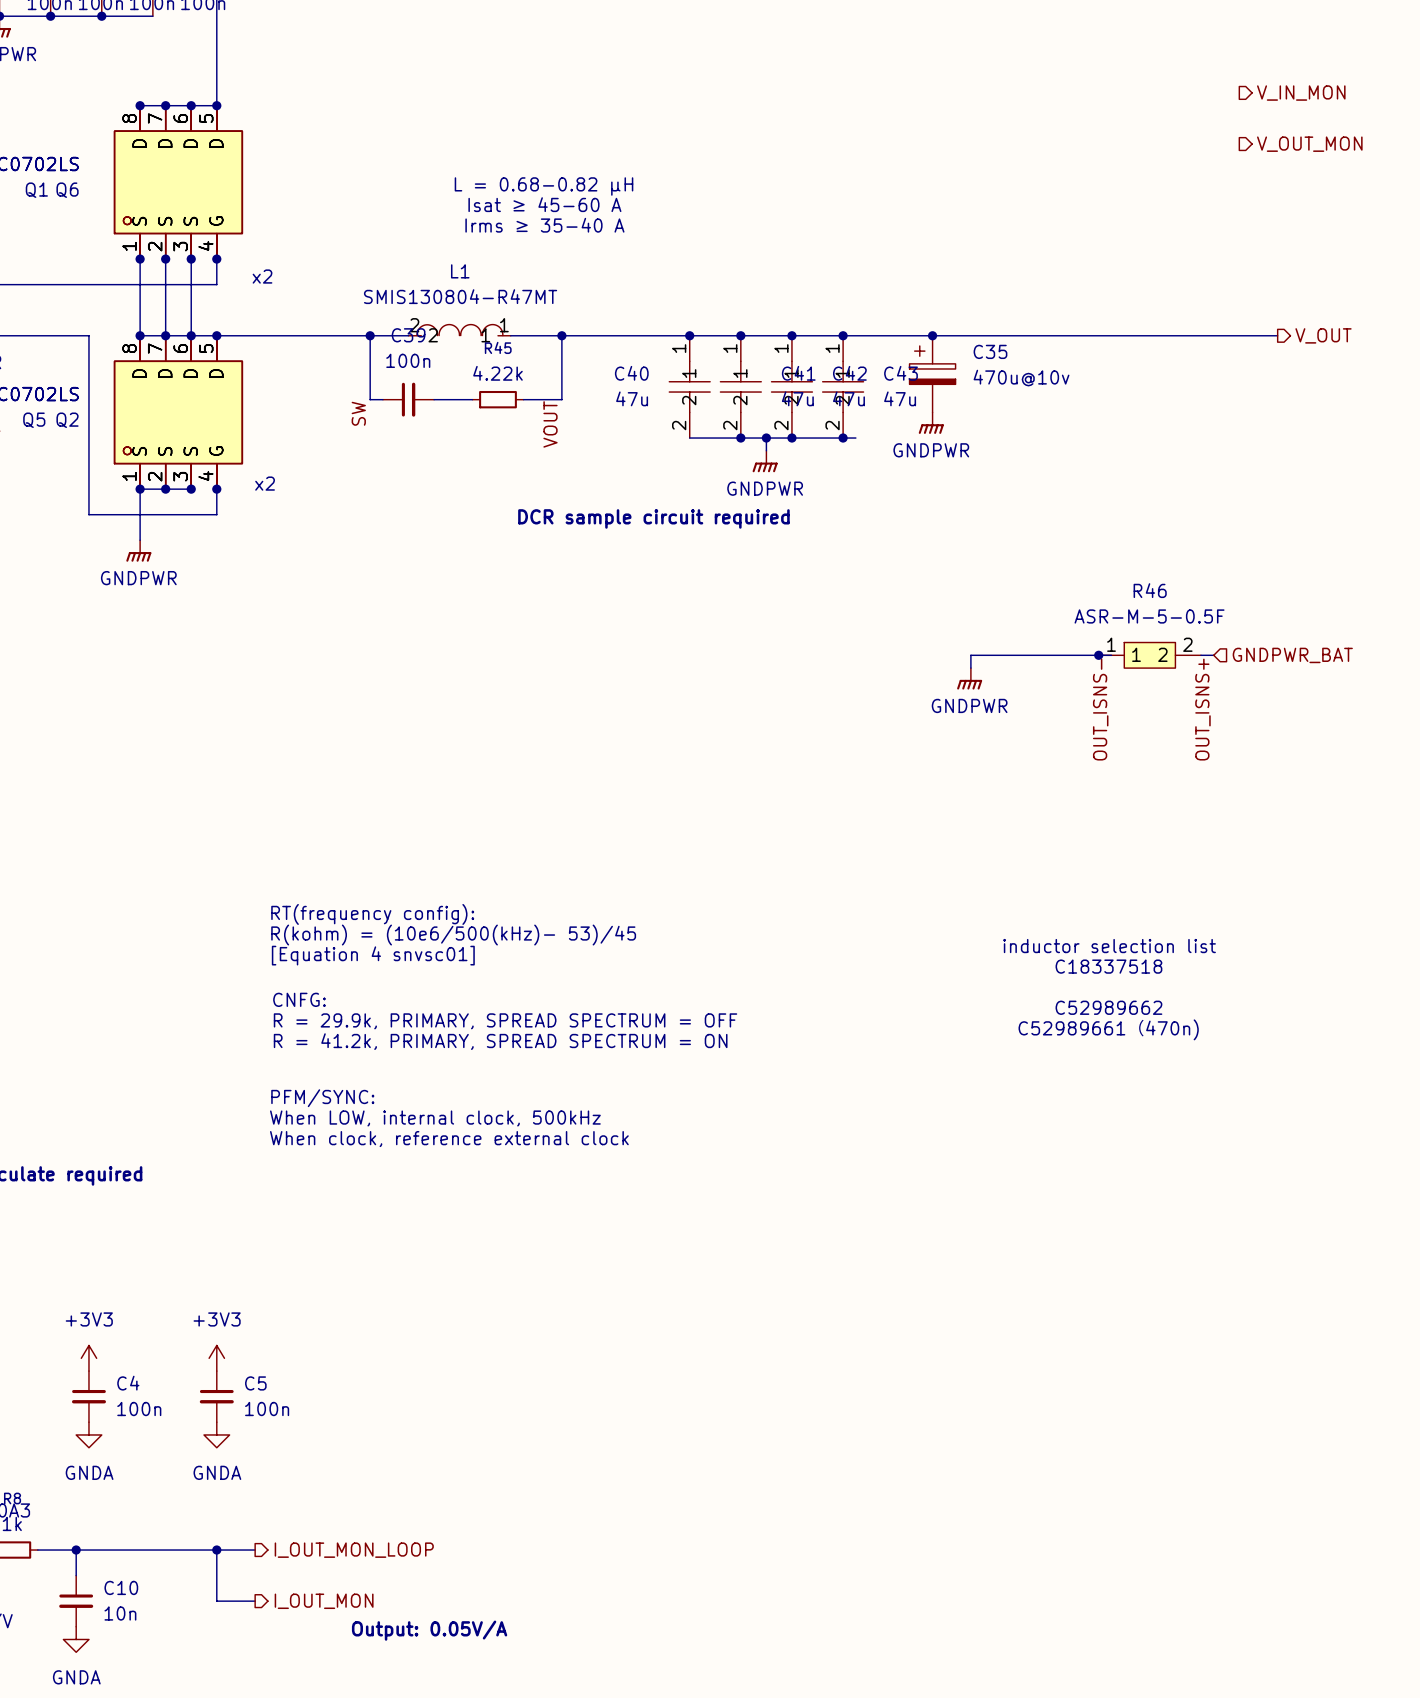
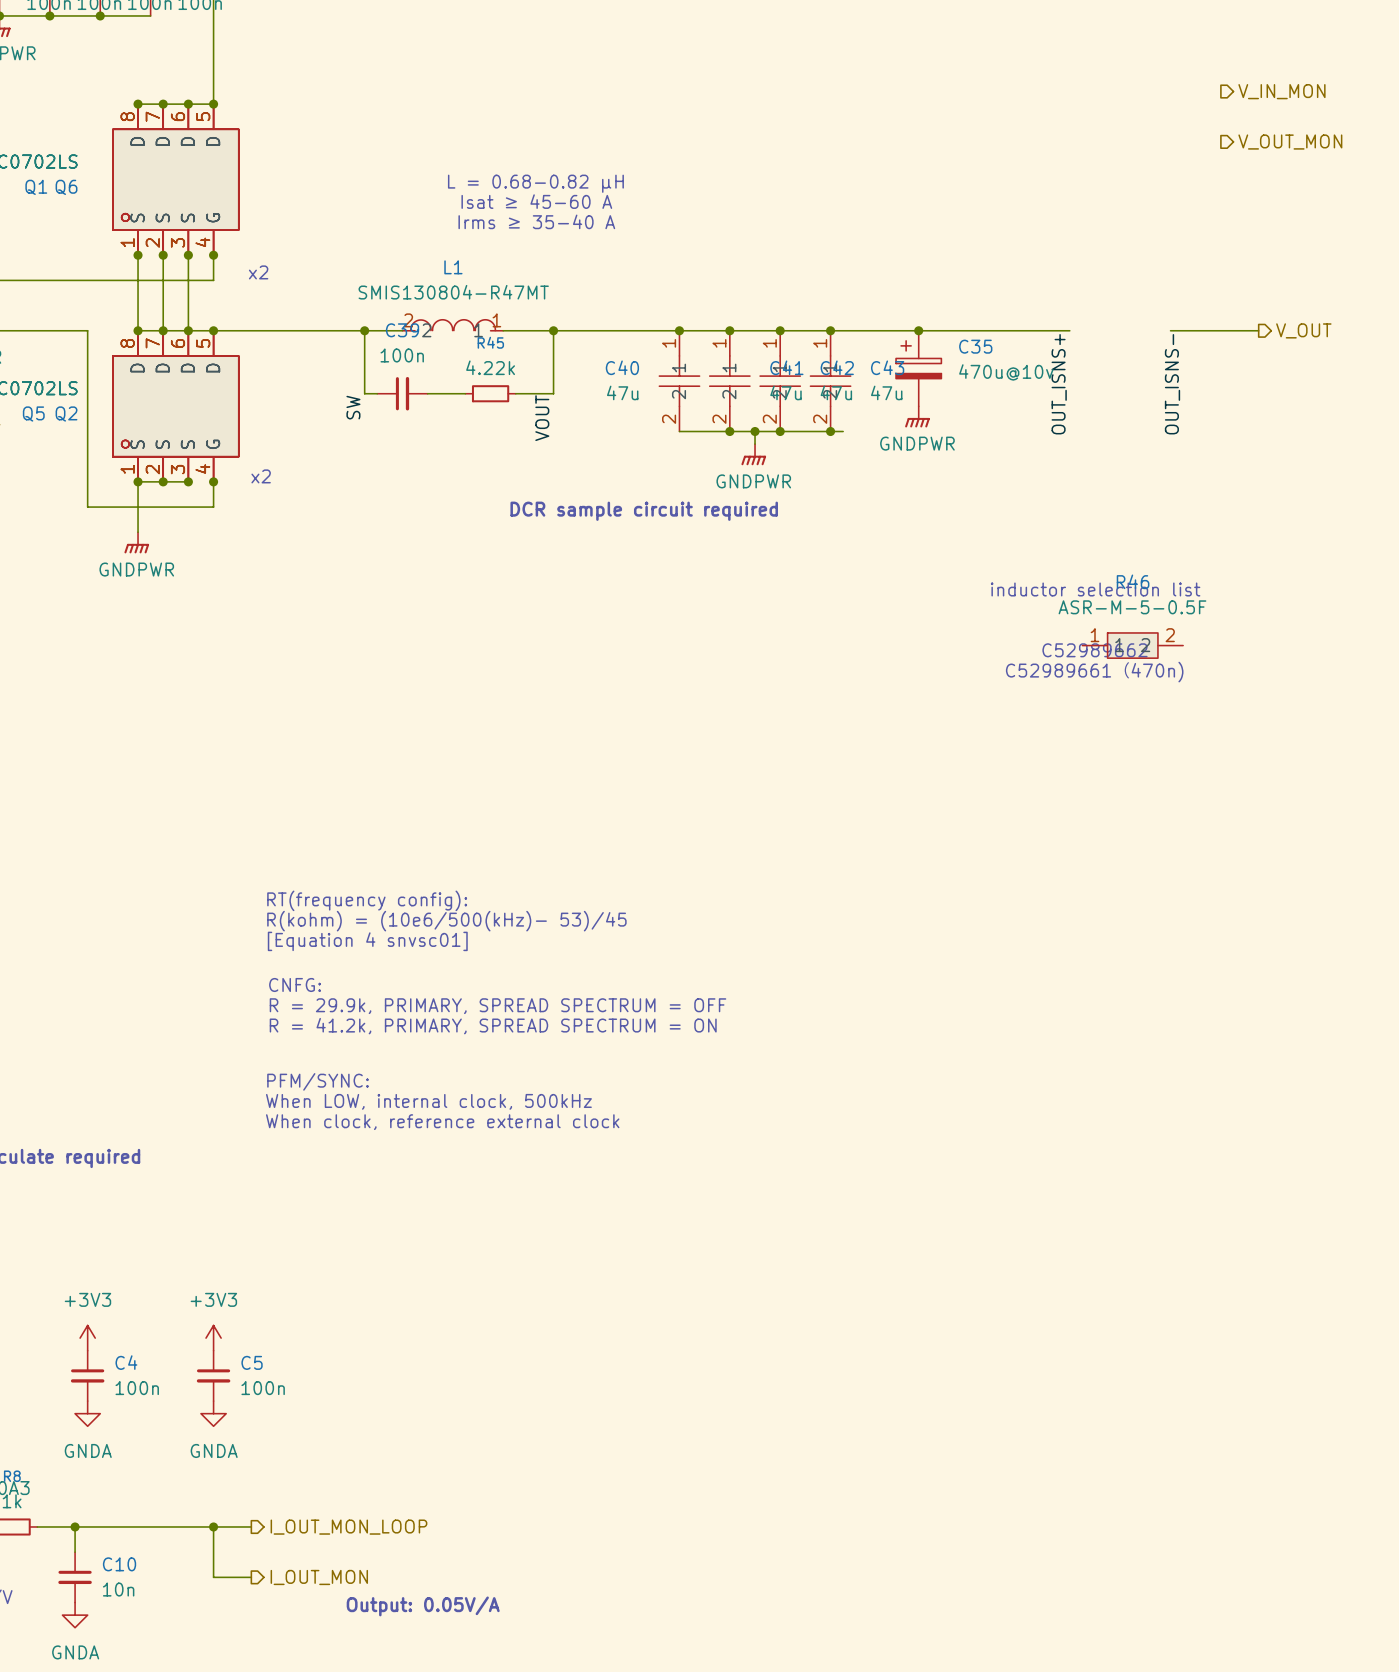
wire: (1085, 335) (1188, 335) -> none
label: none -> OUT_ISNS+ (1059, 384)
label: none -> OUT_ISNS- (1172, 384)
text: none -> inductor selection list (1095, 589)
junction: (1098, 655) -> none
wire: (1111, 655) (970, 655) (970, 668) -> none
wire: (1200, 655) (1213, 655) -> none
hierarchical label: GNDPWR_BAT (1292, 655) -> none
text: none -> C52989662 (1094, 650)
power symbol: GNDPWR (969, 678) -> none
text: none -> C52989661（470n) (1094, 671)
label: OUT_ISNS- (1100, 709) -> none
label: OUT_ISNS+ (1202, 709) -> none
text: inductor selection list (1109, 946) -> none
text: C18337518 (1108, 966) -> none
text: C52989662 (1108, 1007) -> none
text: C52989661（470n) (1108, 1029) -> none

